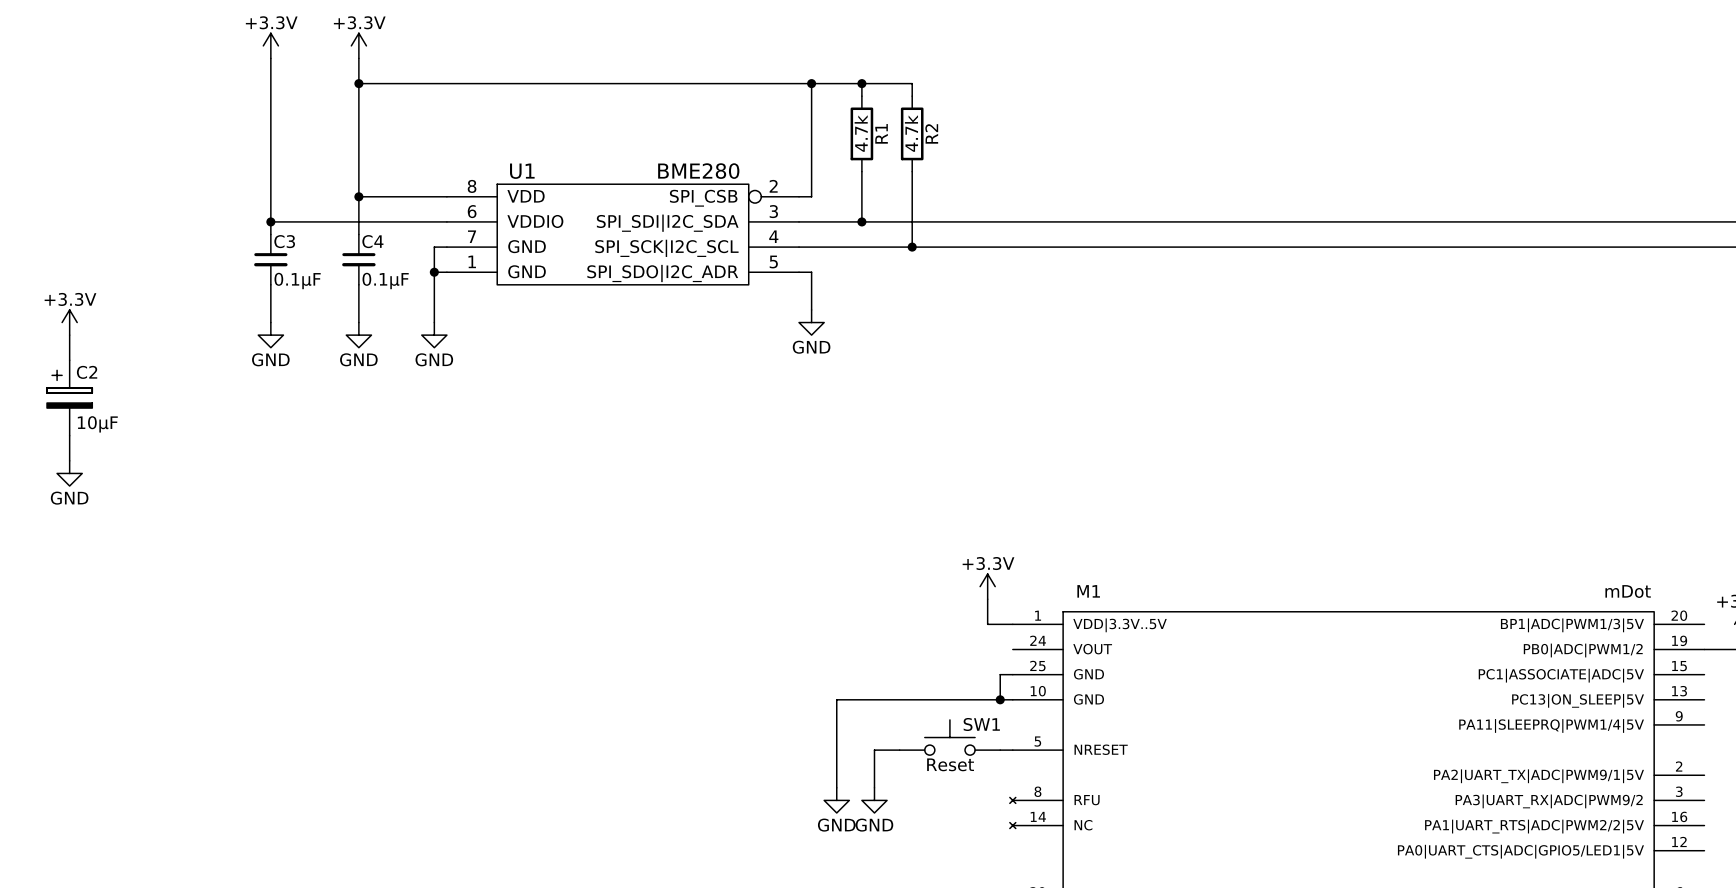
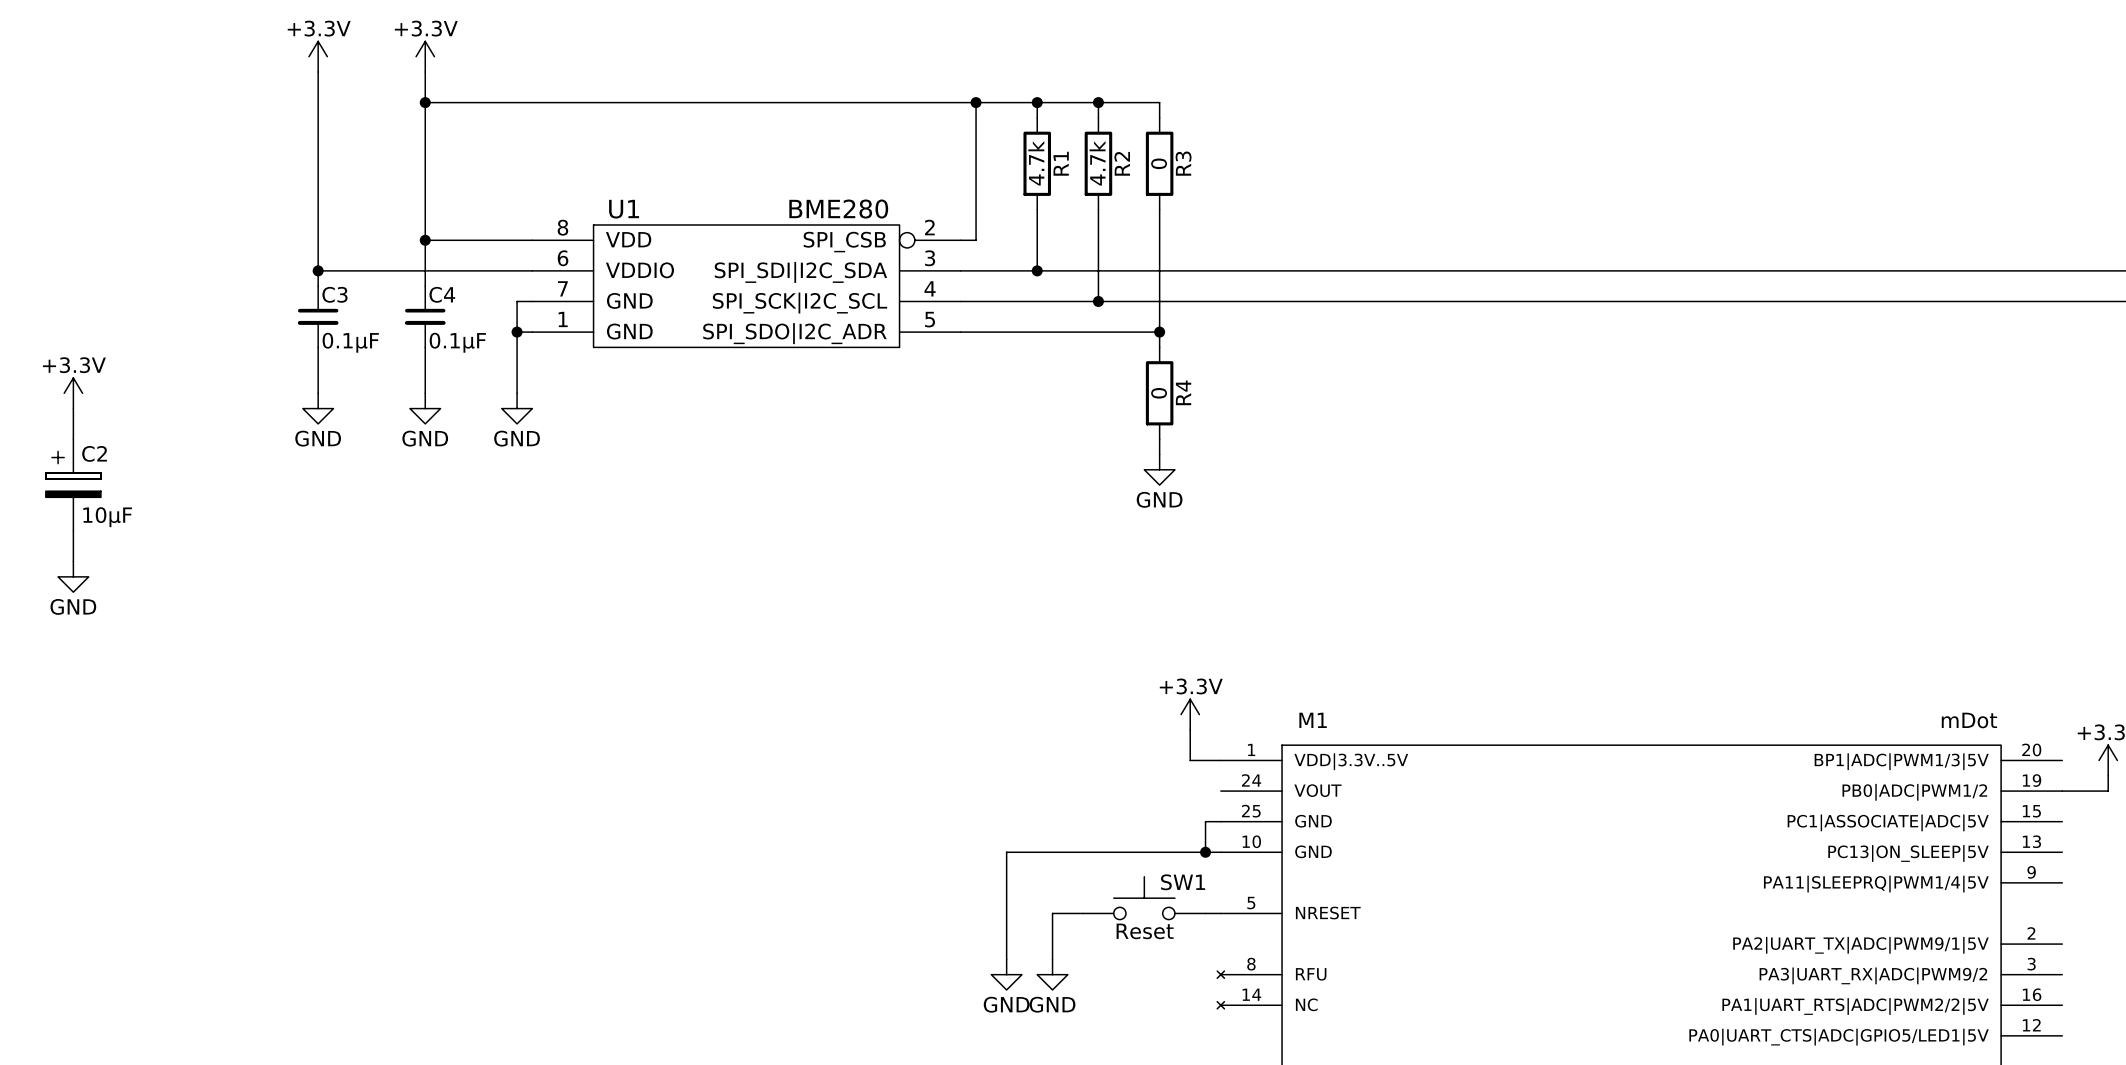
wire: none -> (1098, 102) (1159, 102) (1159, 117)
junction: none -> (1098, 102)
R3: none -> 0 (1159, 163)
wire: none -> (1159, 209) (1159, 347)
wire: (811, 272) (811, 309) -> (976, 332) (1159, 332)
junction: none -> (1159, 332)
power symbol position: GND (811, 322) -> GND (1159, 469)
R4: none -> 0 (1159, 393)
wire: none -> (1159, 439) (1159, 454)

